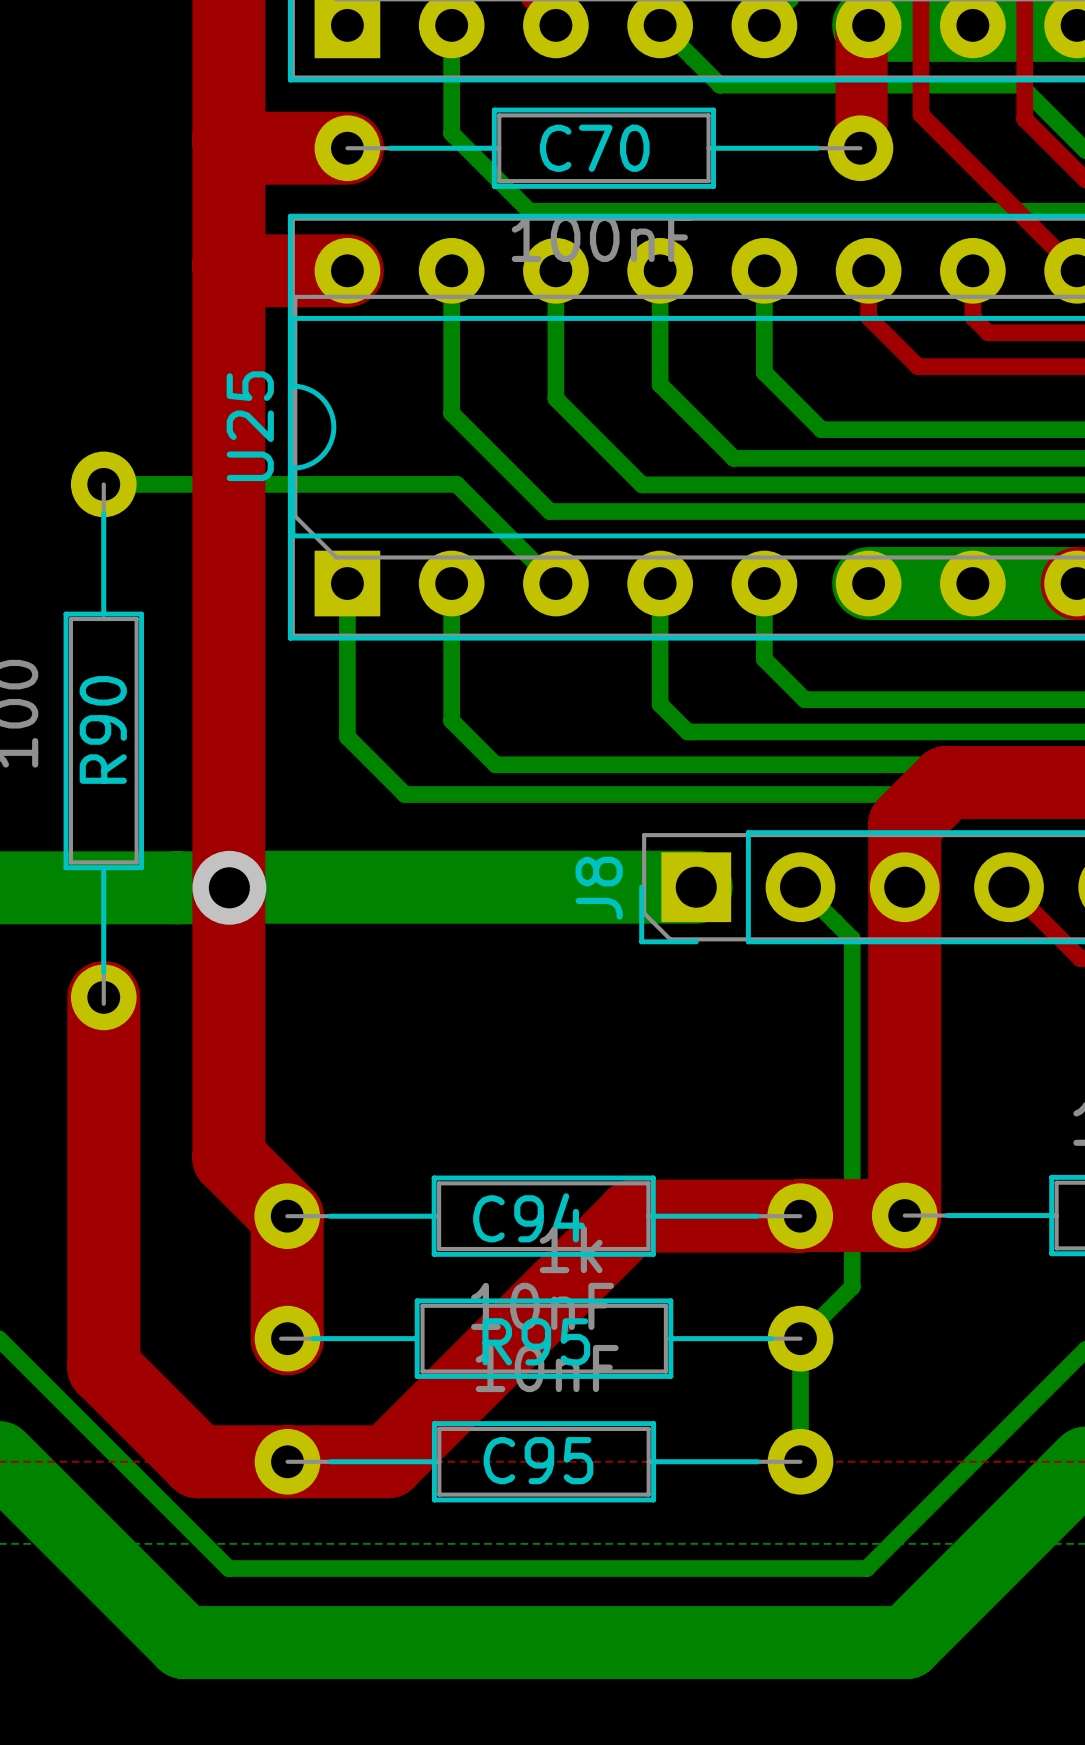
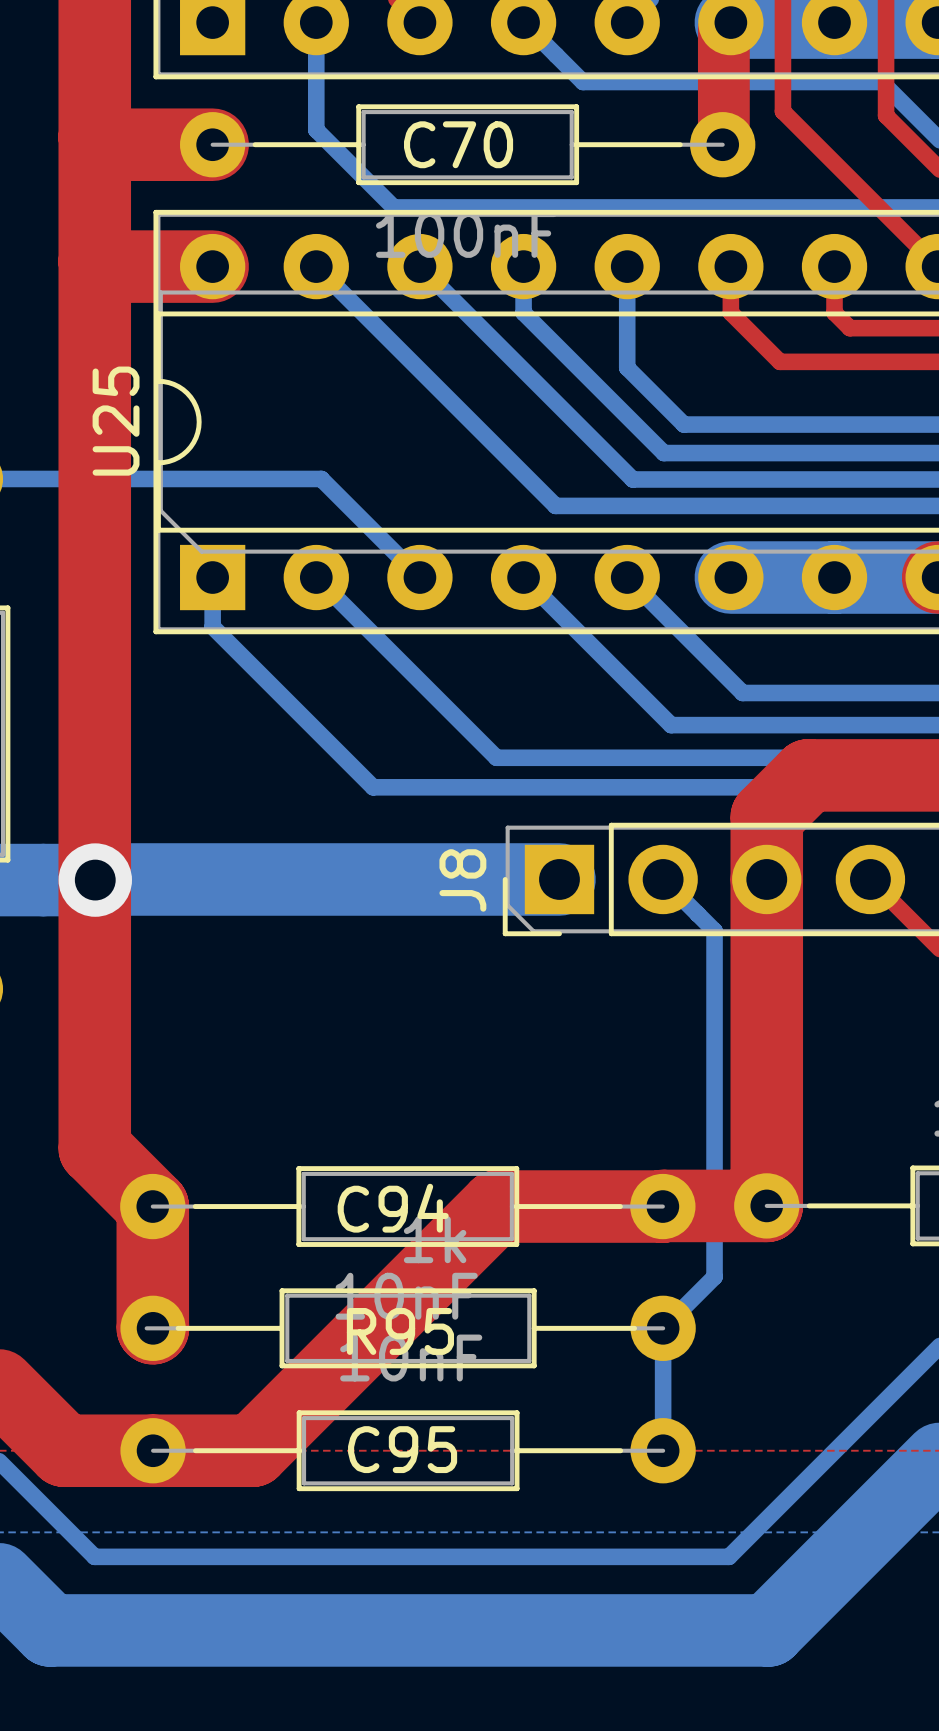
bottom track: (451, 270) (451, 413) (549, 511) (692, 511) -> (316, 266) (555, 505)
bottom track: (555, 270) (555, 398) (642, 484) (770, 484) -> (419, 266) (632, 479)
bottom track: (660, 317) (660, 384) (733, 458) (801, 458) -> (523, 312) (663, 453)
bottom track: (451, 583) (451, 720) (495, 764) (632, 764) -> (316, 577) (496, 757)
bottom track: (660, 583) (660, 704) (687, 731) (808, 731) -> (523, 577) (671, 725)
bottom track: (764, 583) (764, 659) (804, 699) (880, 699) -> (627, 577) (742, 692)
bottom track: (347, 633) (347, 736) (405, 794) (508, 794) -> (212, 626) (373, 787)

